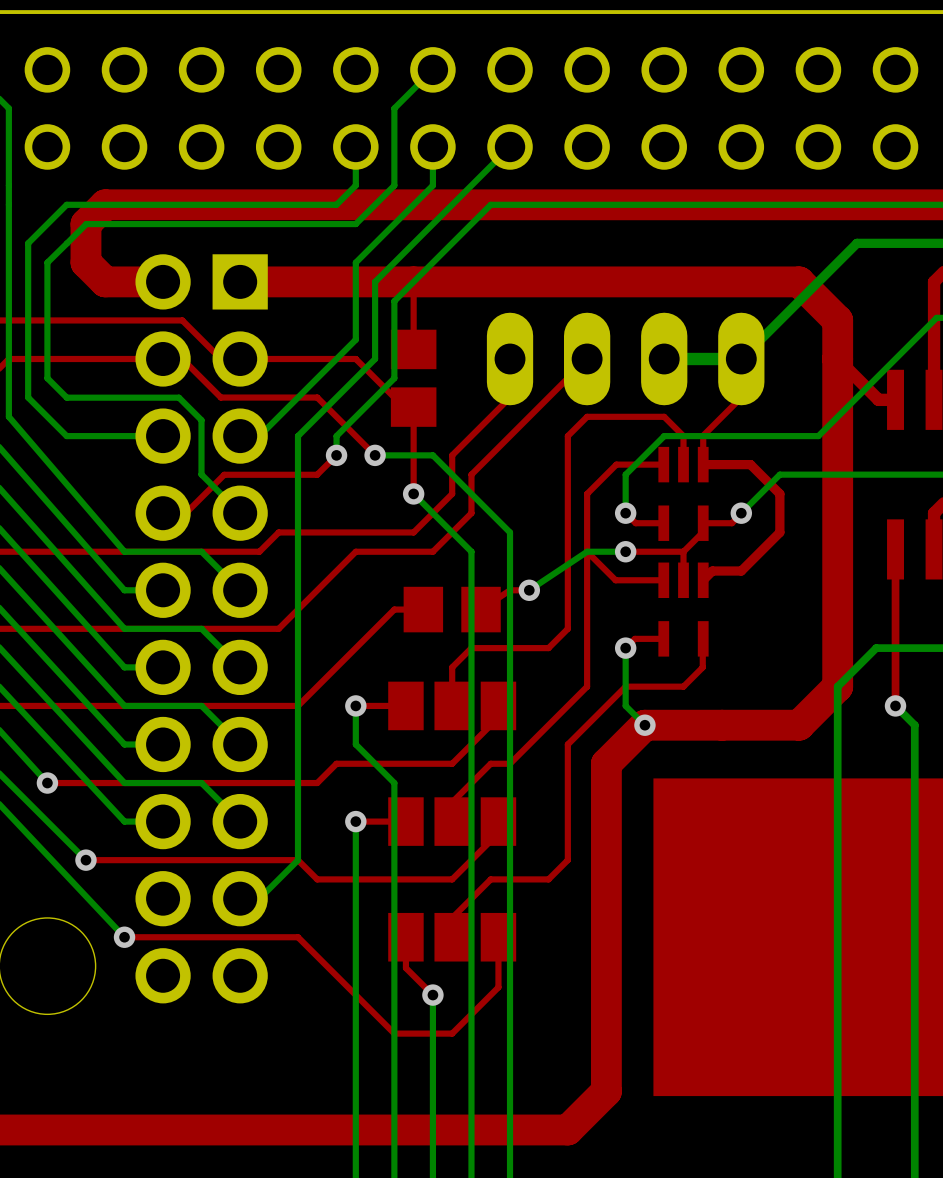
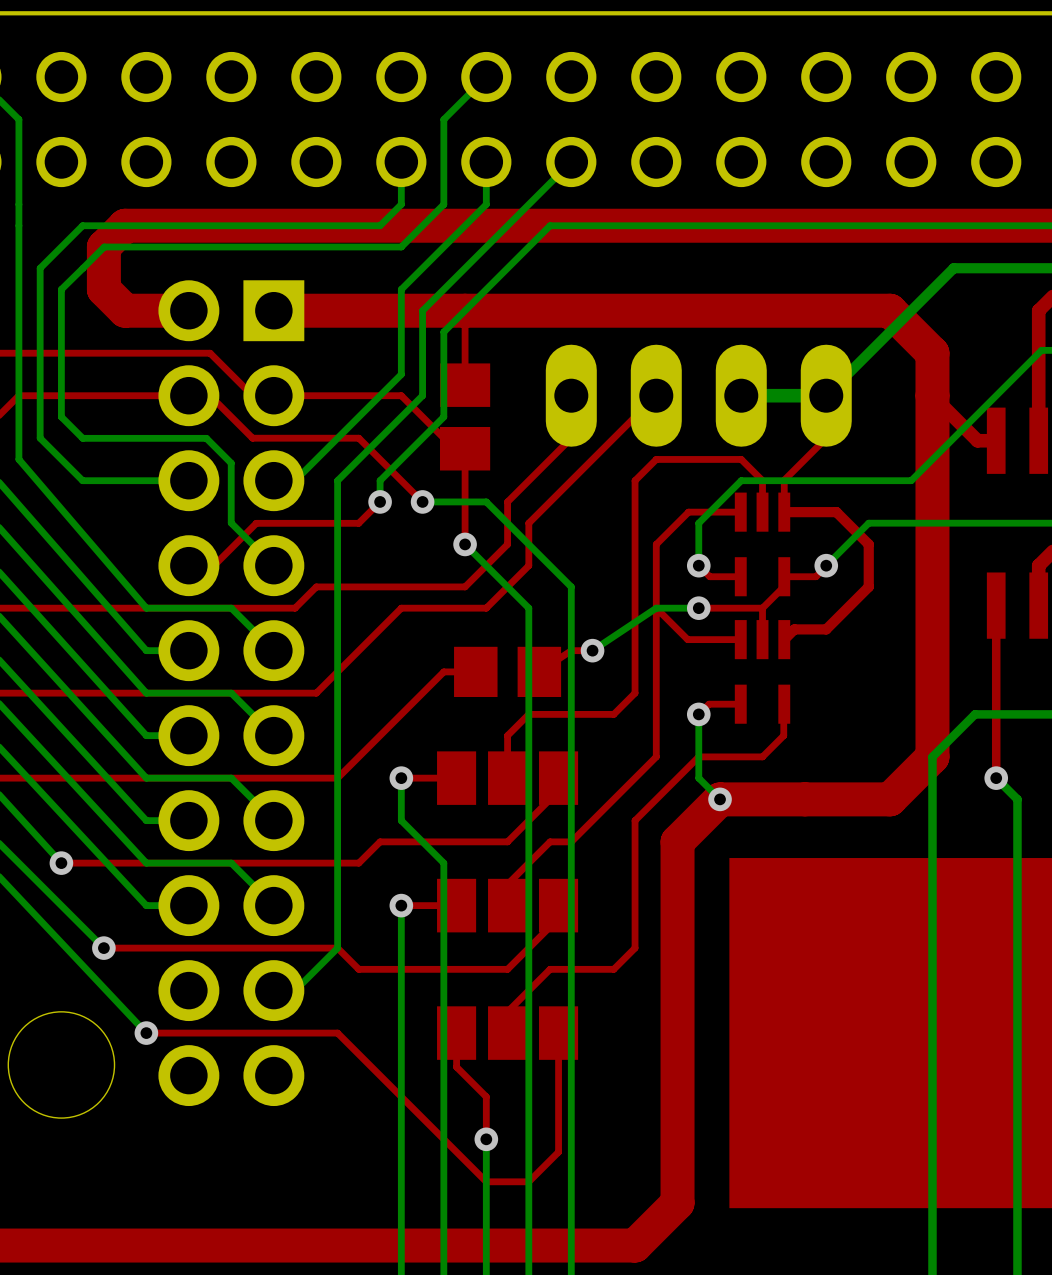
top track: (498, 987) (452, 1033) (394, 1033) -> (558, 1088) (558, 1152) (528, 1181) (486, 1181) (443, 1139)
bottom track: (432, 995) (432, 1033) -> none
top track: none -> (486, 1096) (486, 1139)
via position: (432, 995) -> (486, 1139)

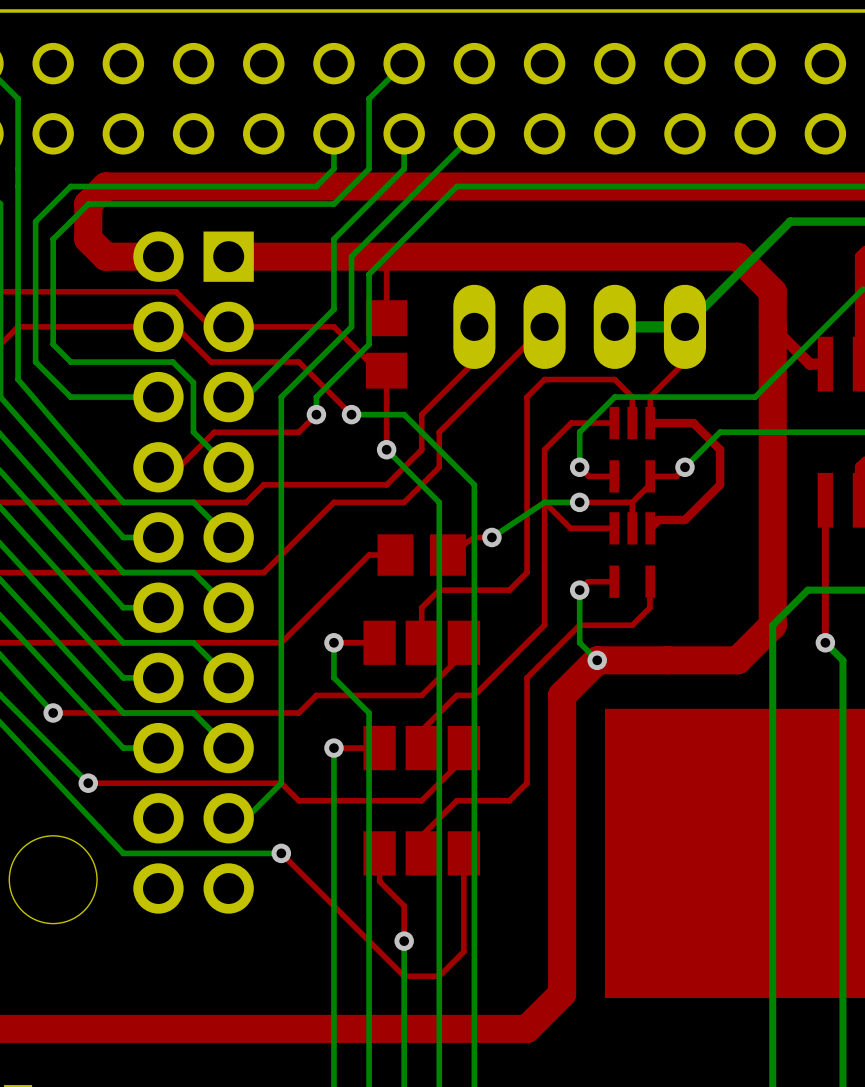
via position: (146, 1033) -> (281, 853)
bottom track: none -> (281, 853) (123, 853)
top track: (337, 1033) (146, 1033) -> none

